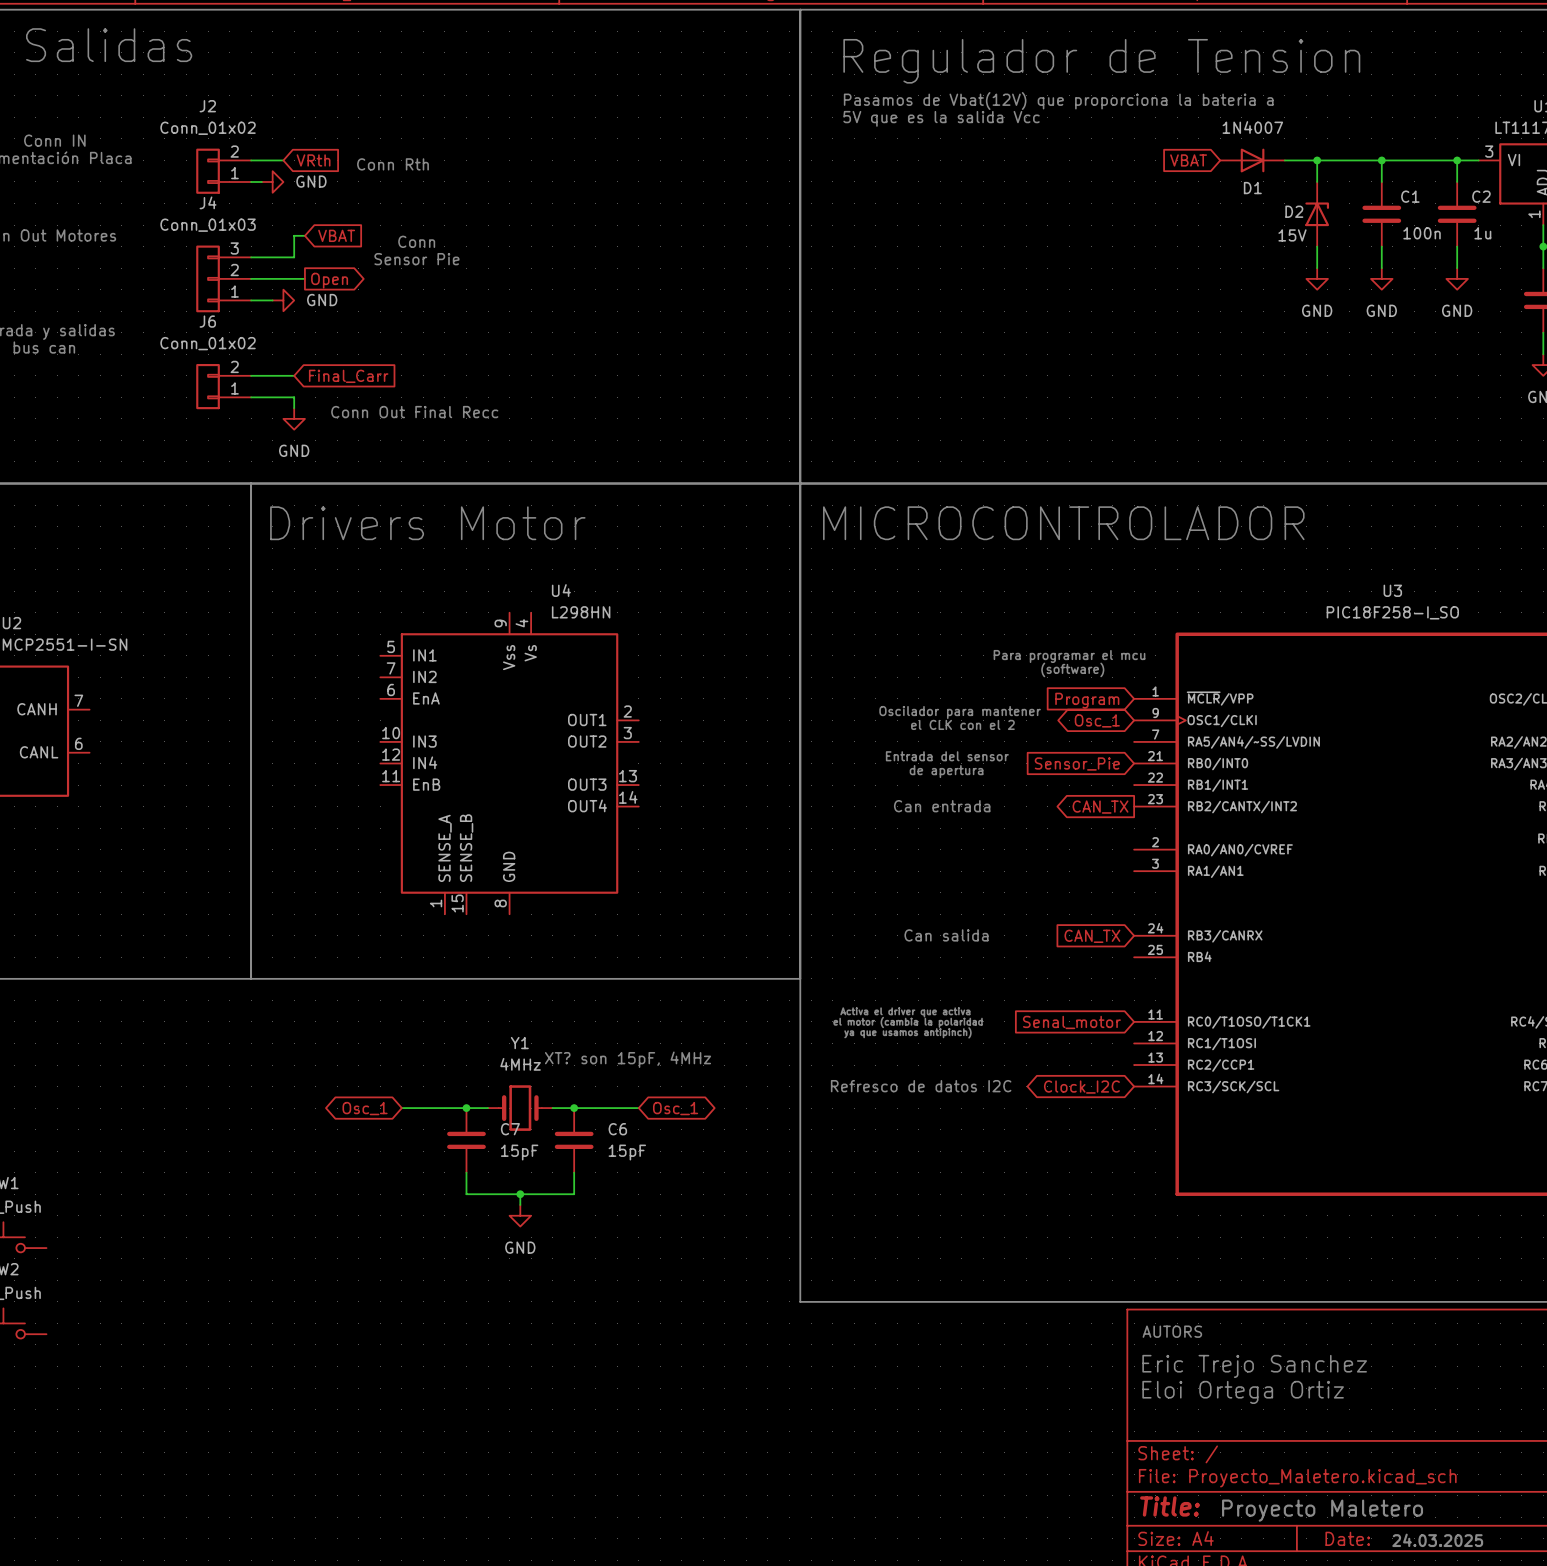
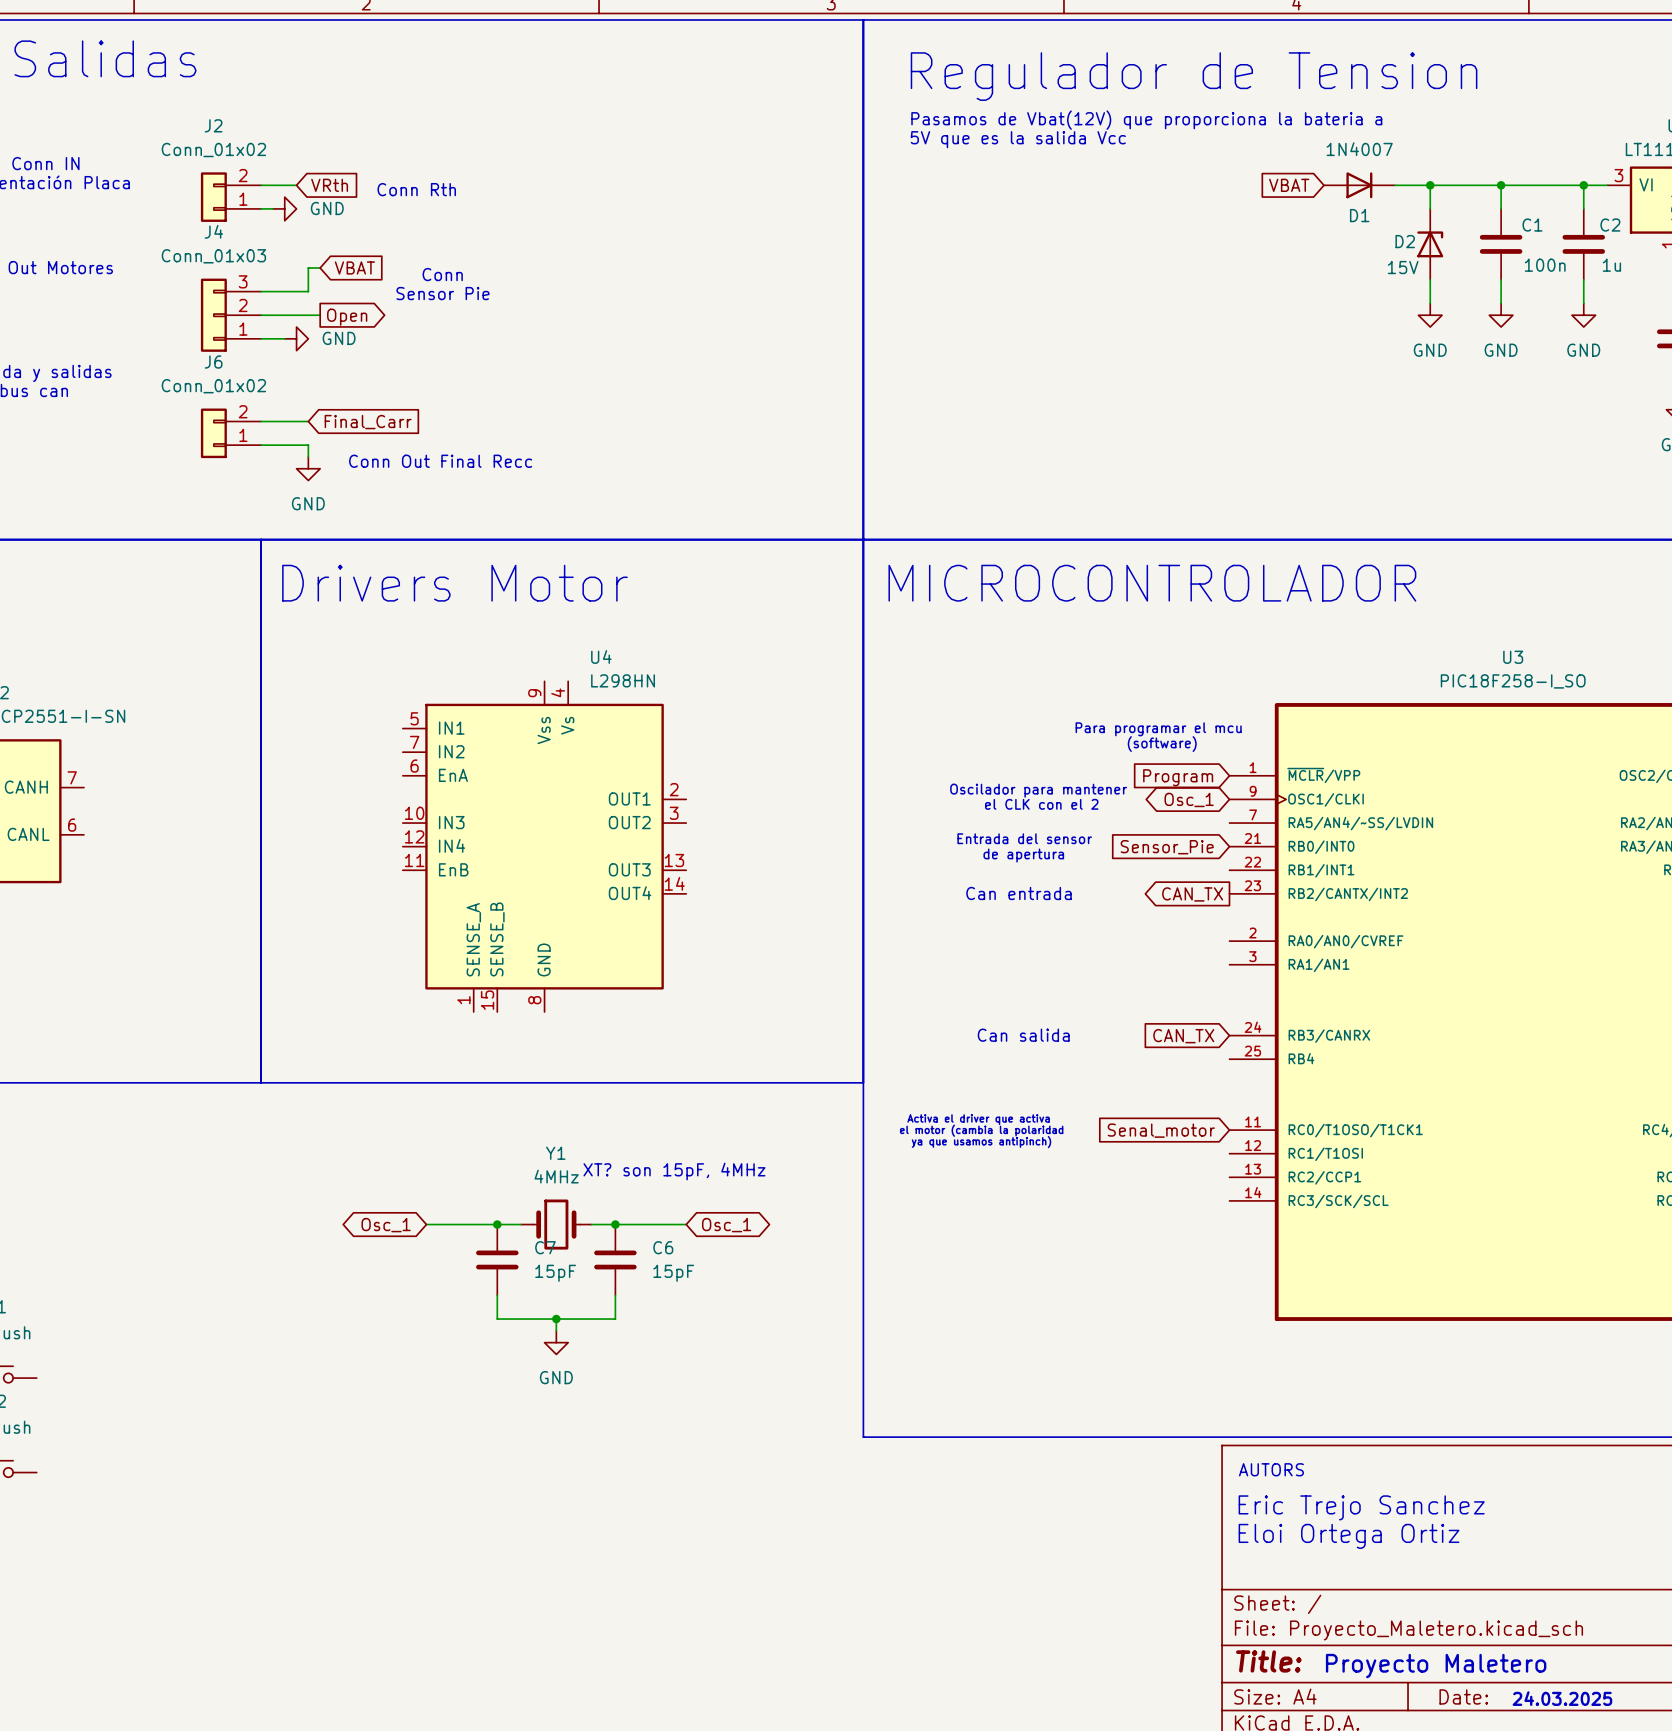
text: Refresco de datos I2C (921, 1086) -> none
global label: Clock_I2C (1081, 1087) -> none

